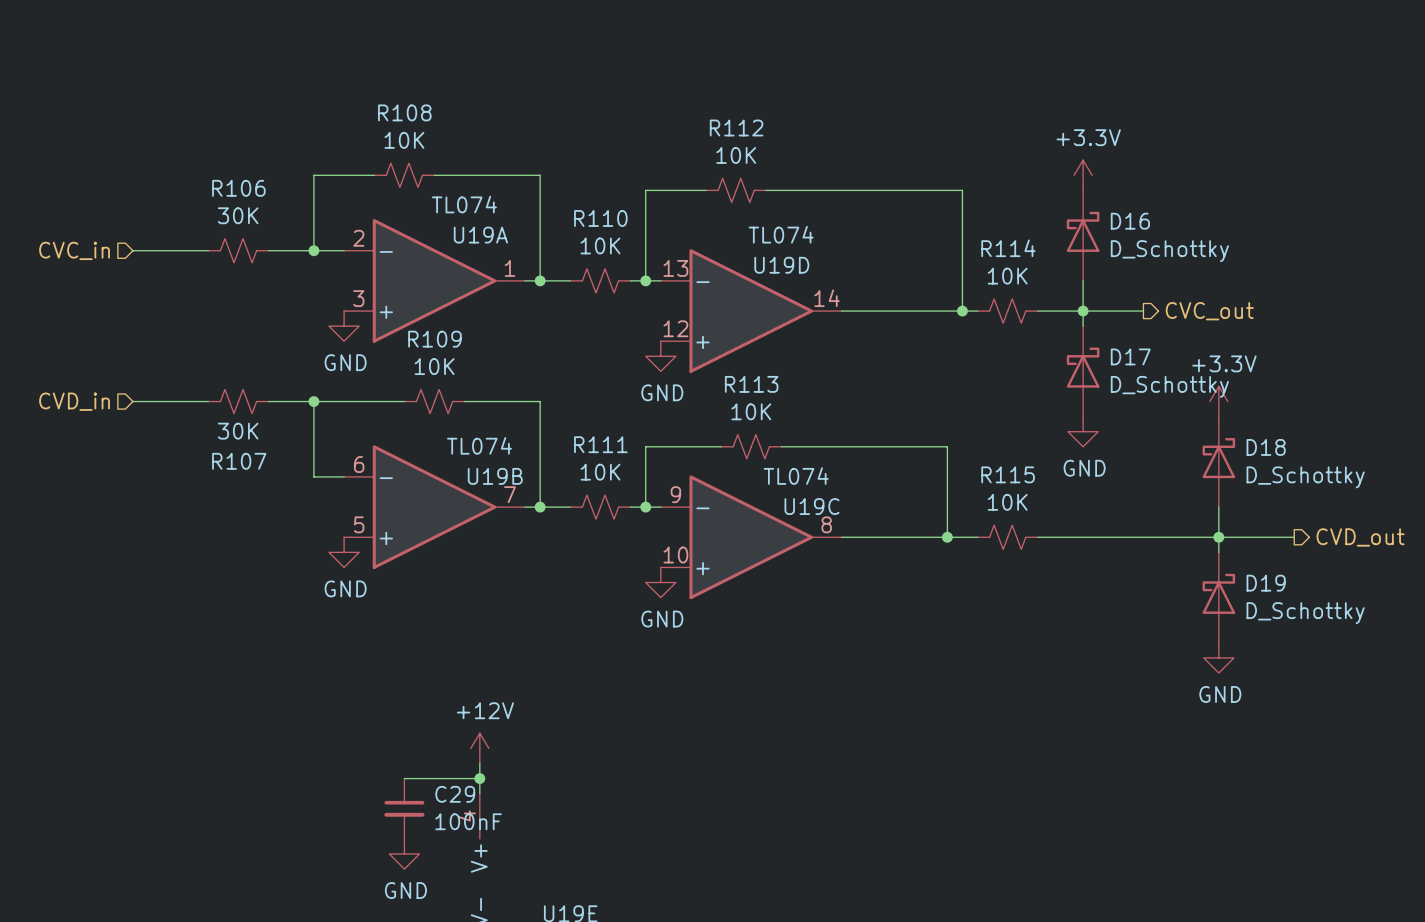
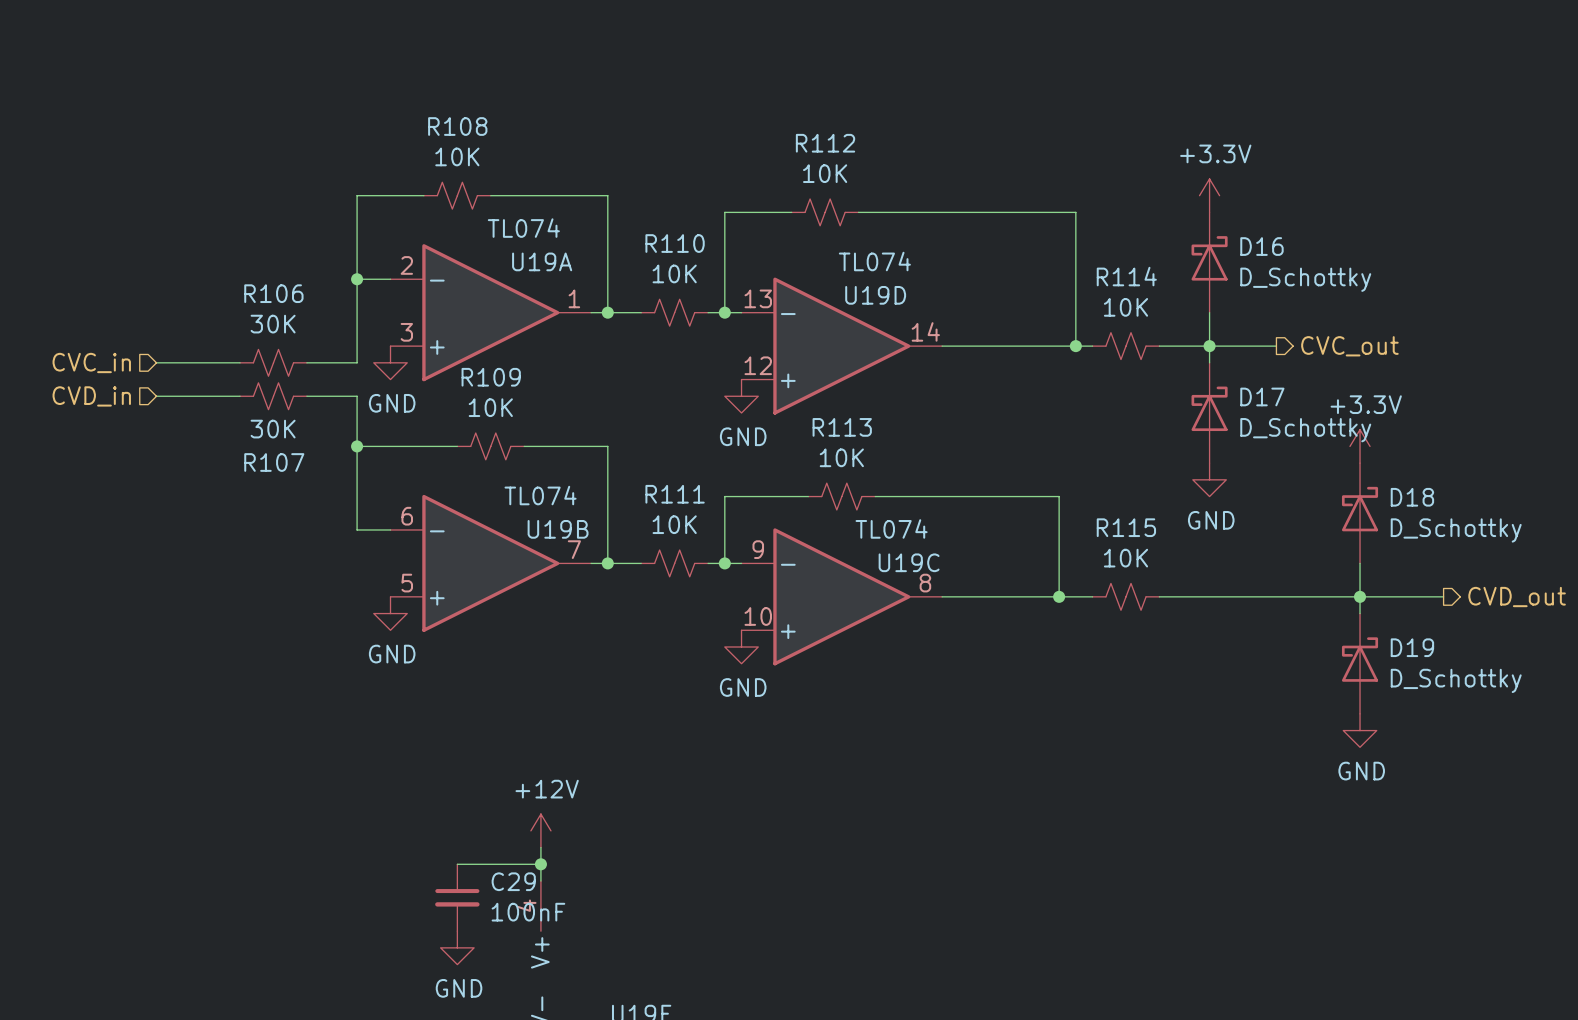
hierarchical label position: CVC_in (74, 250) -> CVC_in (91, 363)
wire: (132, 250) (208, 250) -> (156, 362) (240, 362)
R106 position: (238, 250) -> (273, 362)
wire: (268, 250) (313, 250) -> (306, 362) (357, 362) (357, 279)
hierarchical label position: CVD_in (74, 401) -> CVD_in (91, 396)
wire: (132, 401) (208, 401) -> (156, 396) (240, 396)
R107 position: (238, 401) -> (273, 396)
wire: (268, 401) (313, 401) -> (306, 396) (357, 396) (357, 446)

